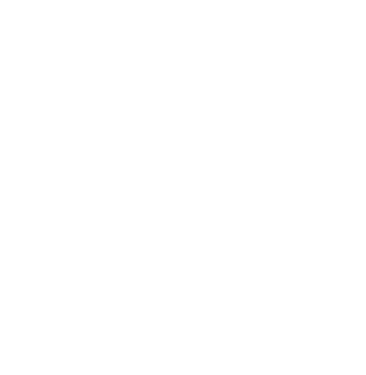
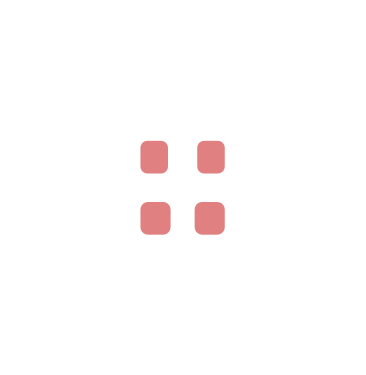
part: none -> (182, 157)
part: none -> (182, 218)

